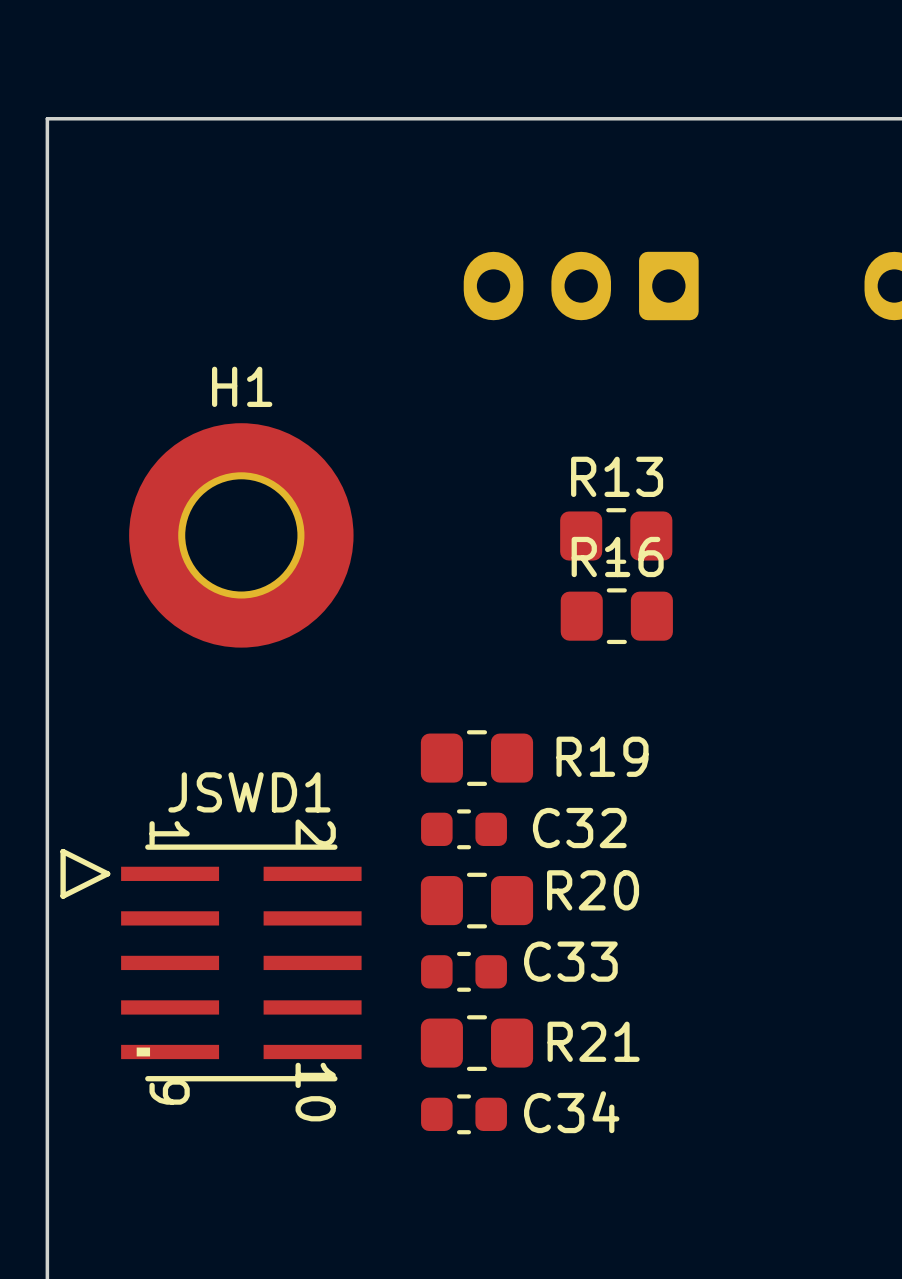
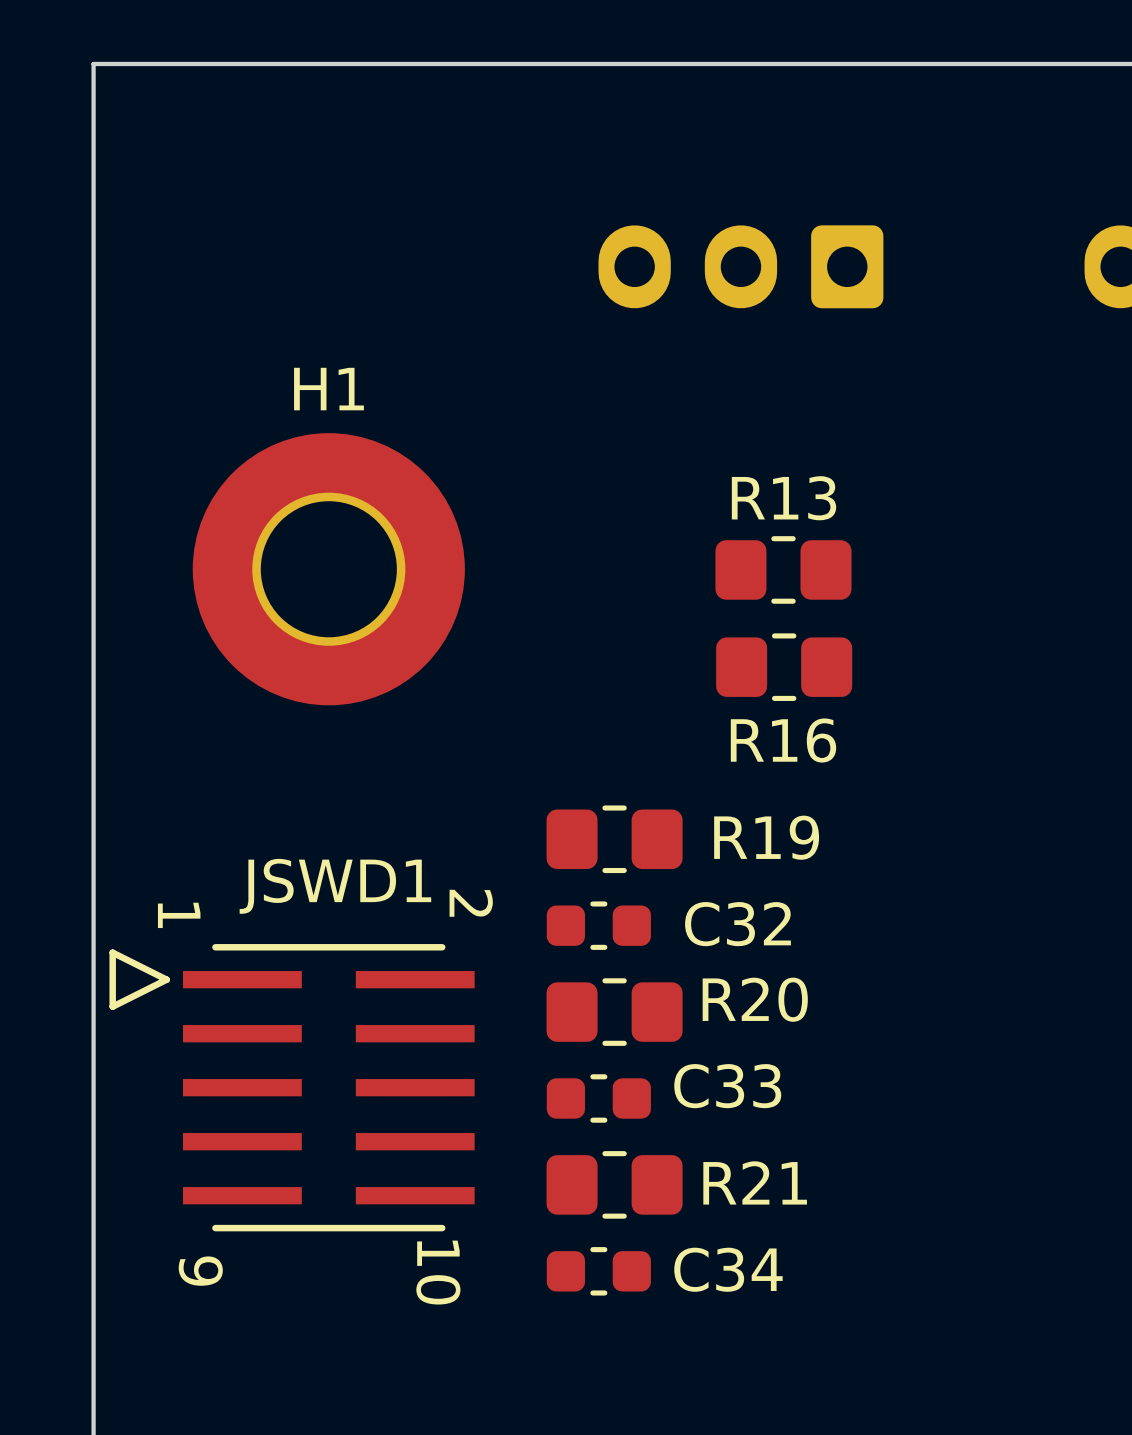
R16 name position: R16 (617, 556) -> R16 (783, 740)
JSWD1 footprint: [60, 844, 362, 1082] -> [109, 944, 475, 1232]

